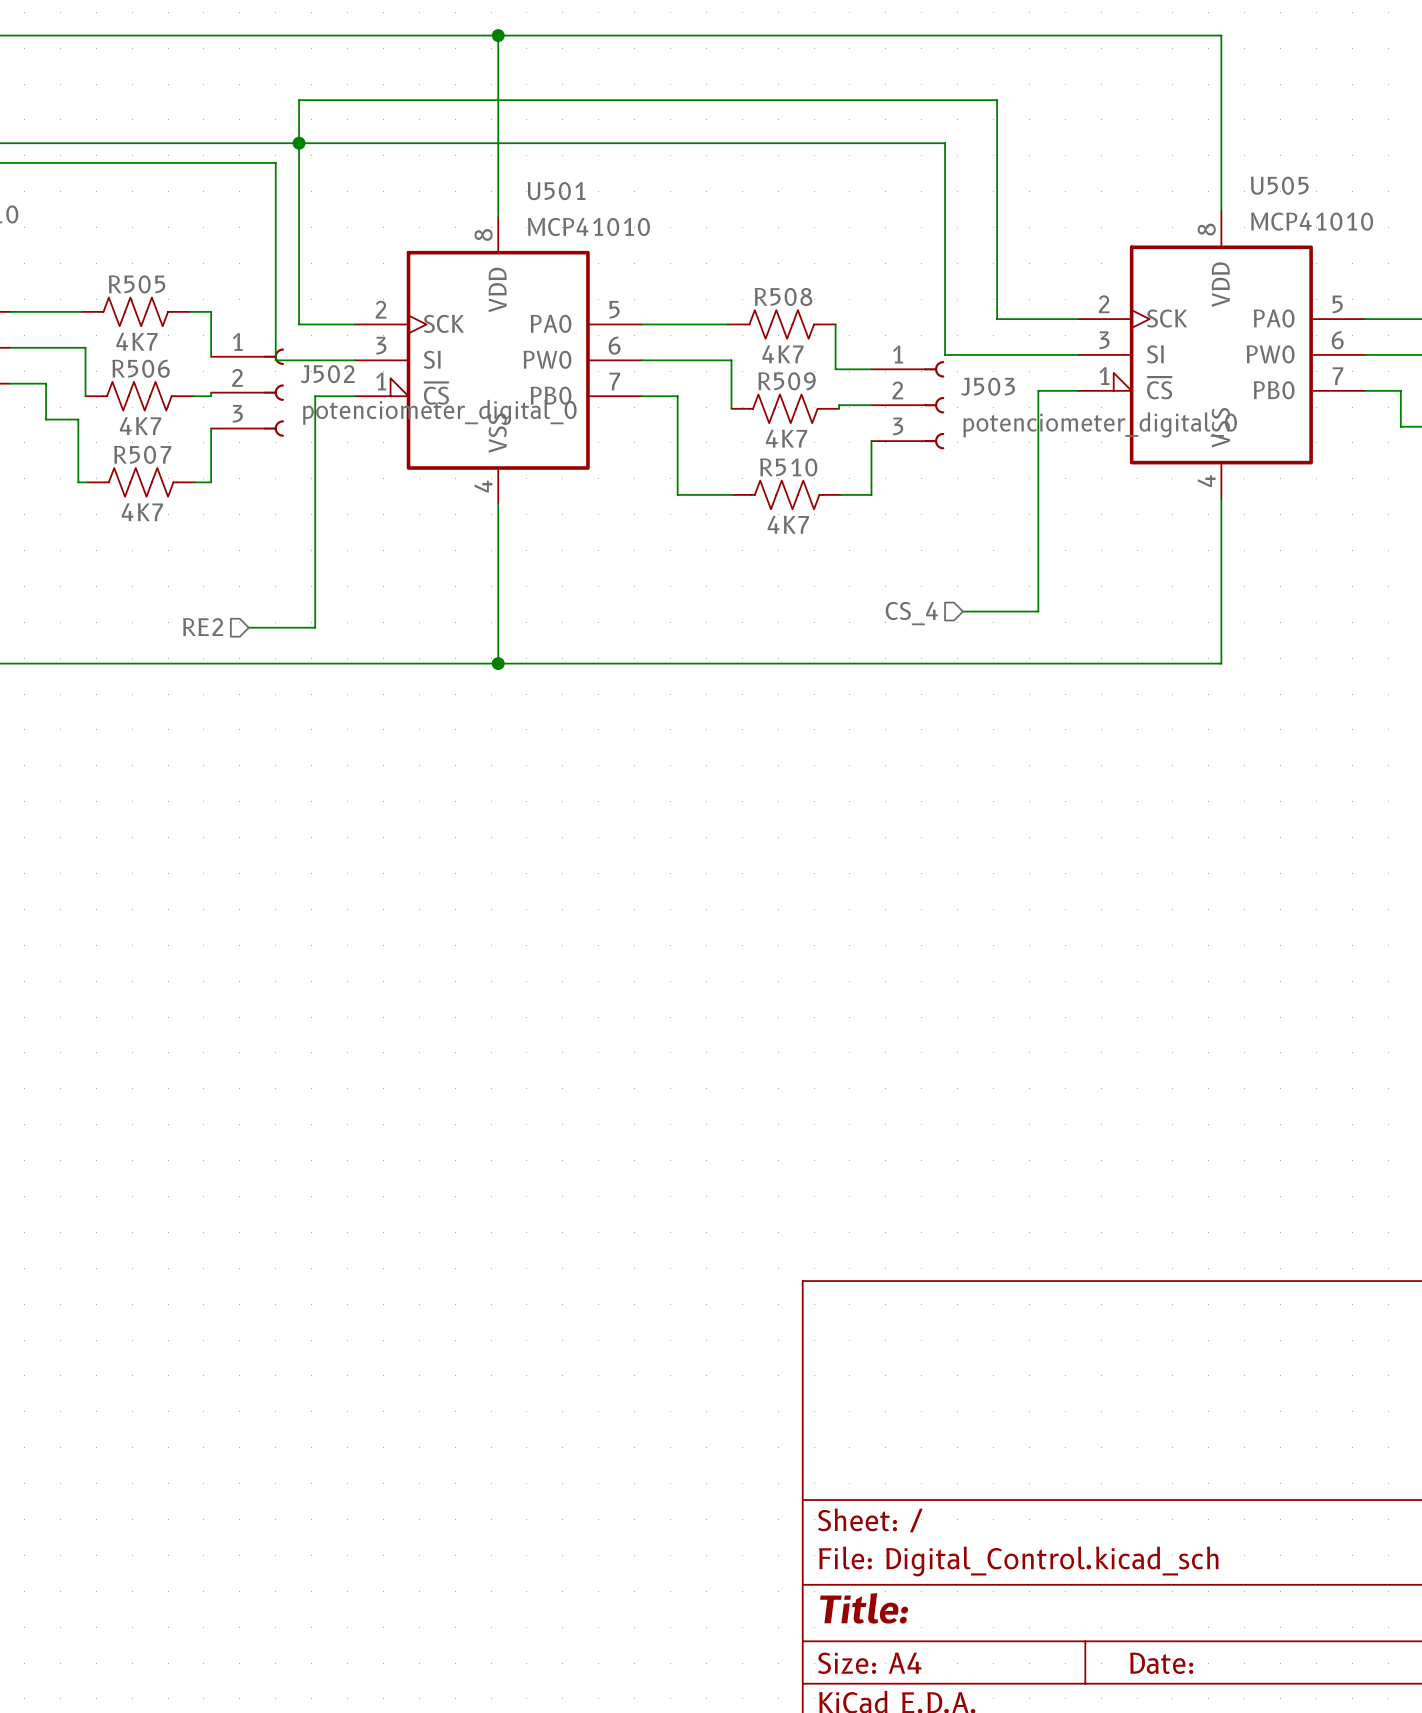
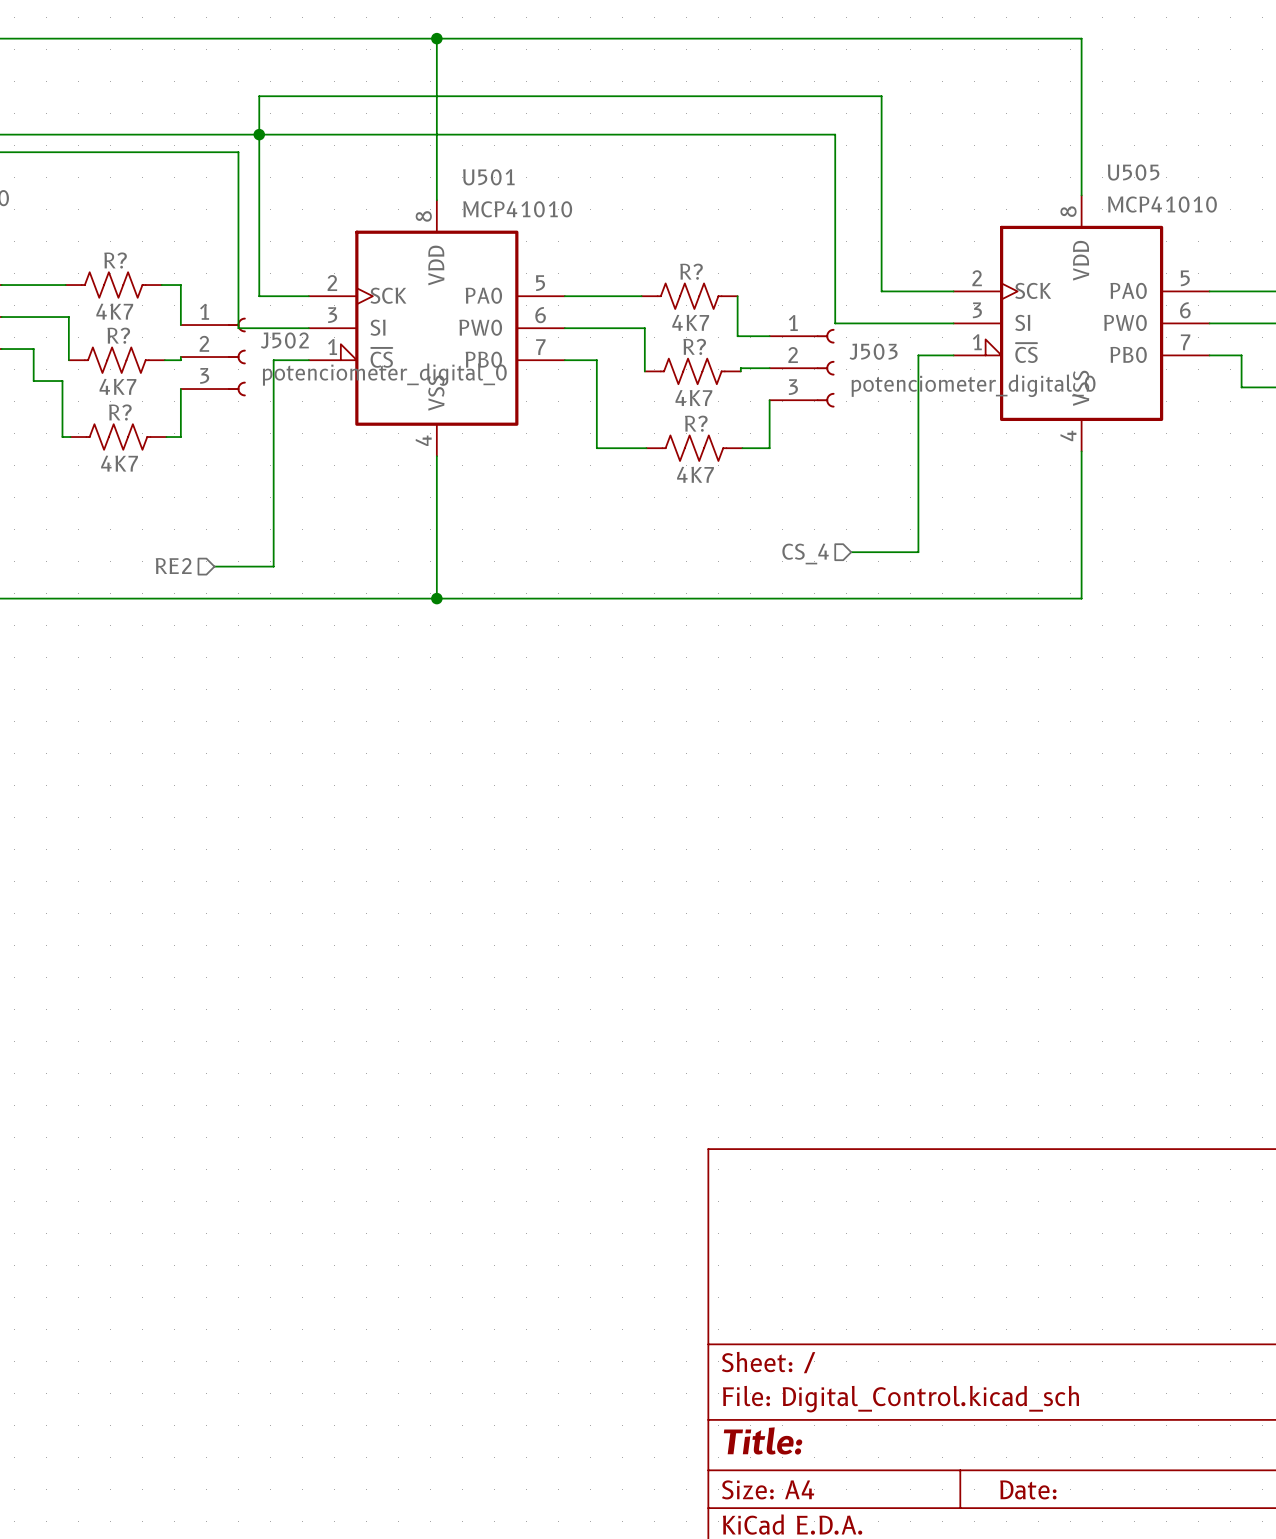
R505 name: R505 (137, 284) -> R? (115, 260)
R508 name: R508 (783, 296) -> R? (691, 271)
R506 name: R506 (141, 368) -> R? (118, 335)
R509 name: R509 (787, 381) -> R? (694, 346)
R507 name: R507 (142, 454) -> R? (120, 412)
R510 name: R510 (788, 467) -> R? (696, 423)

